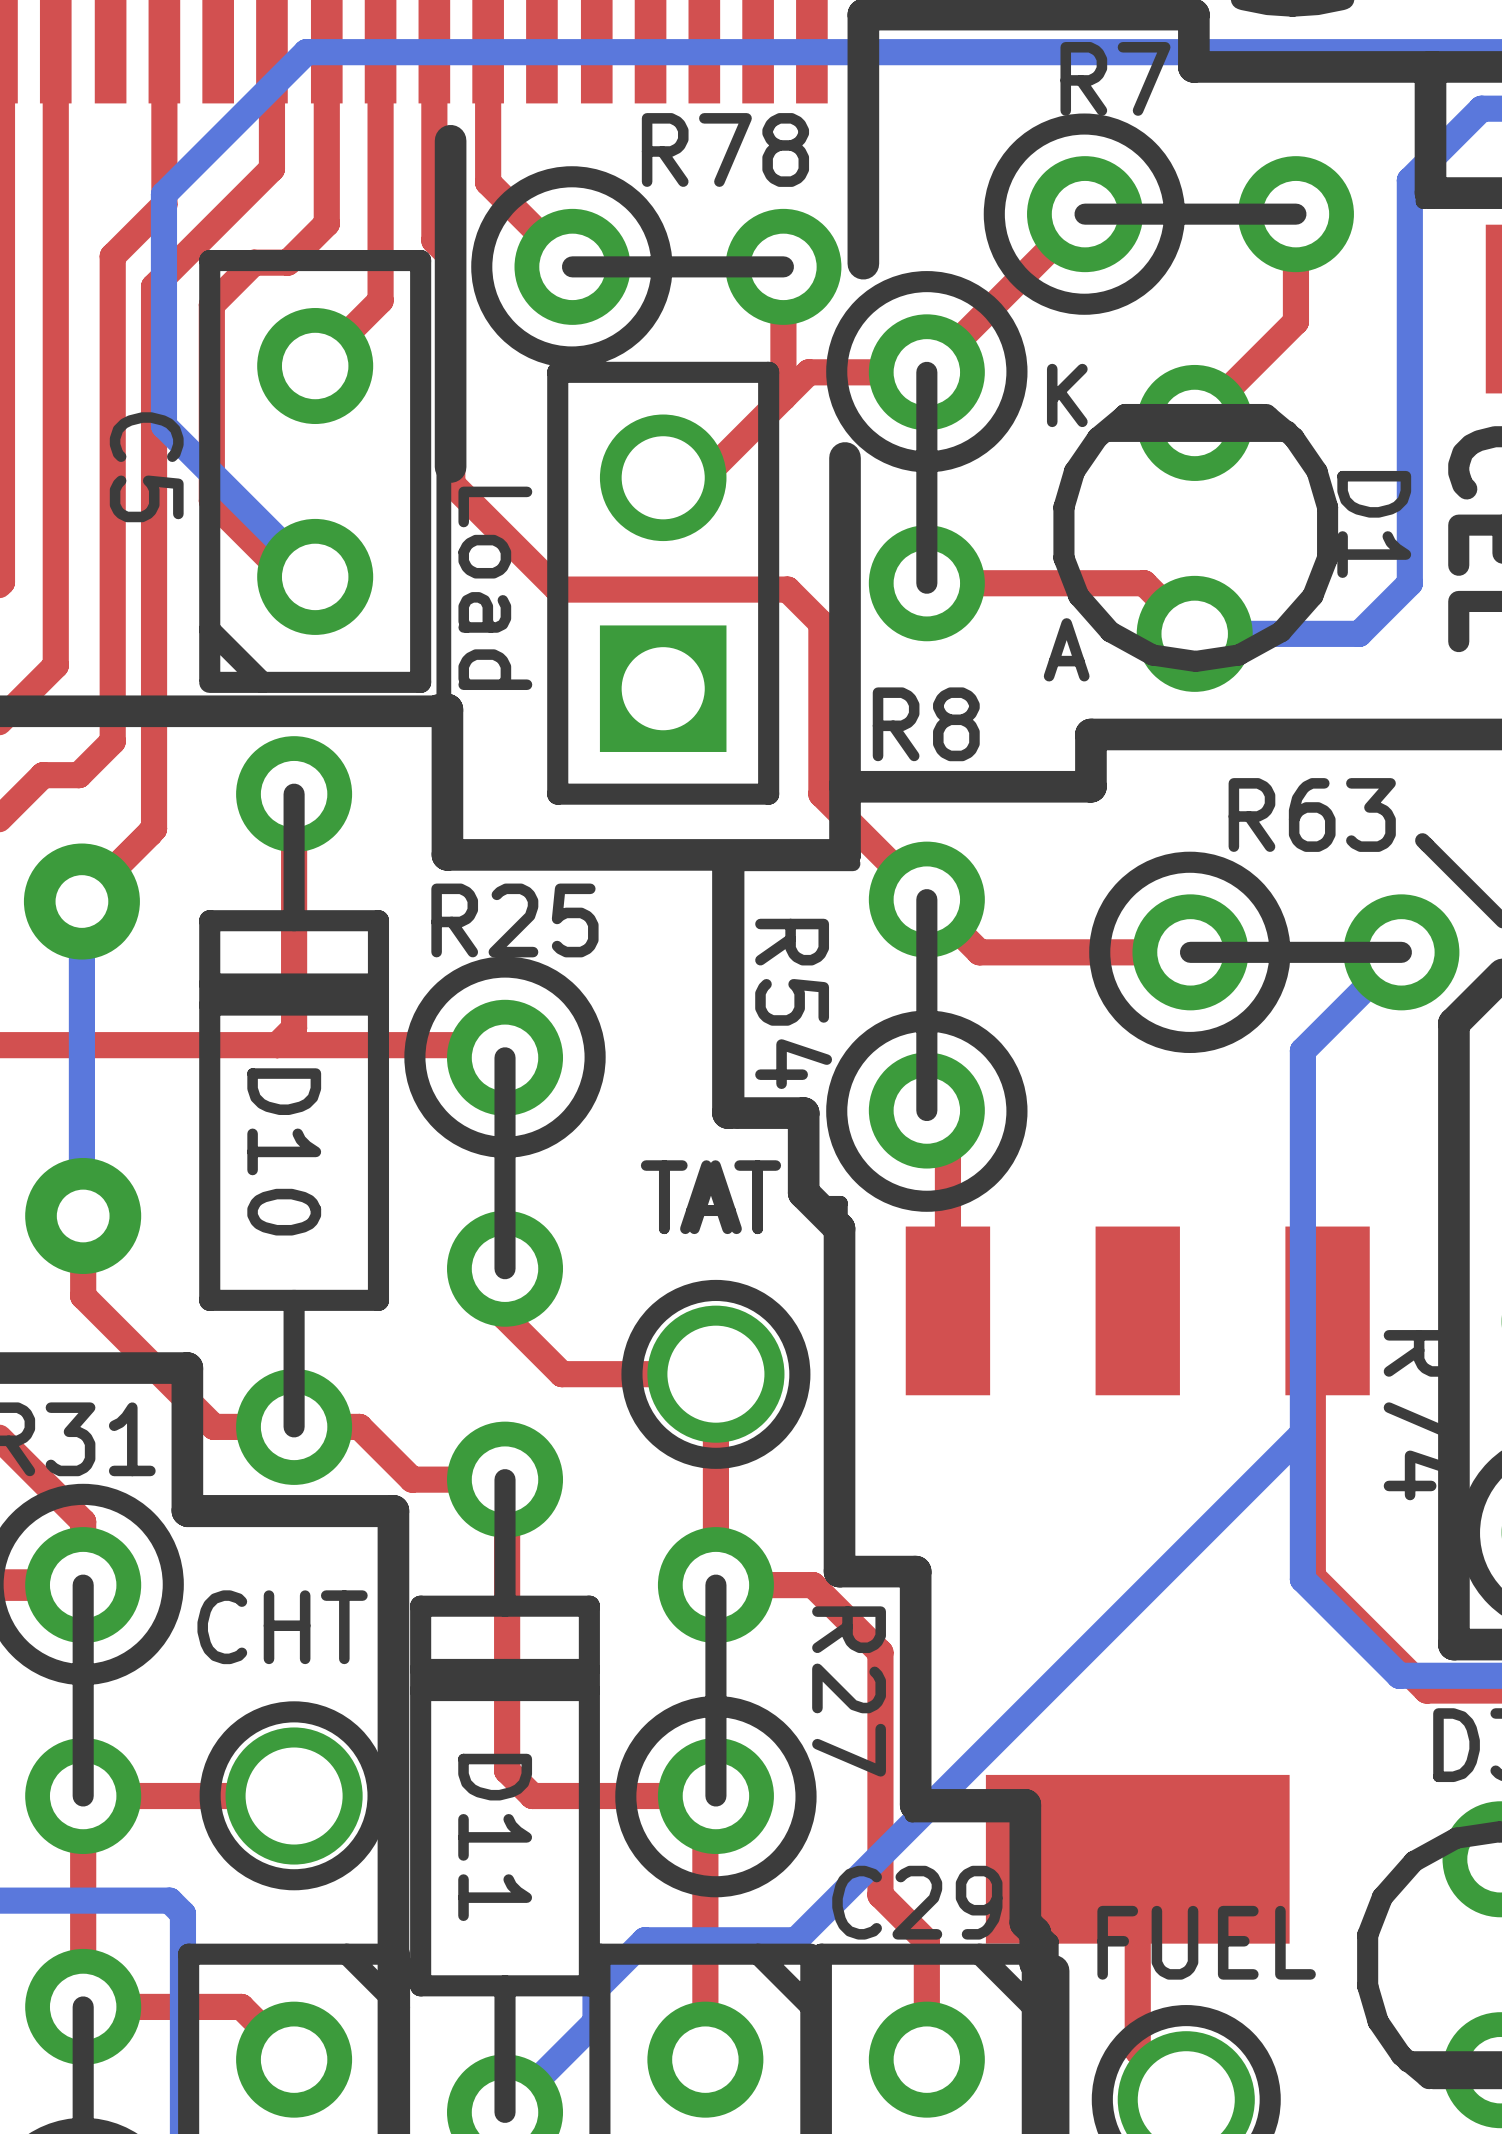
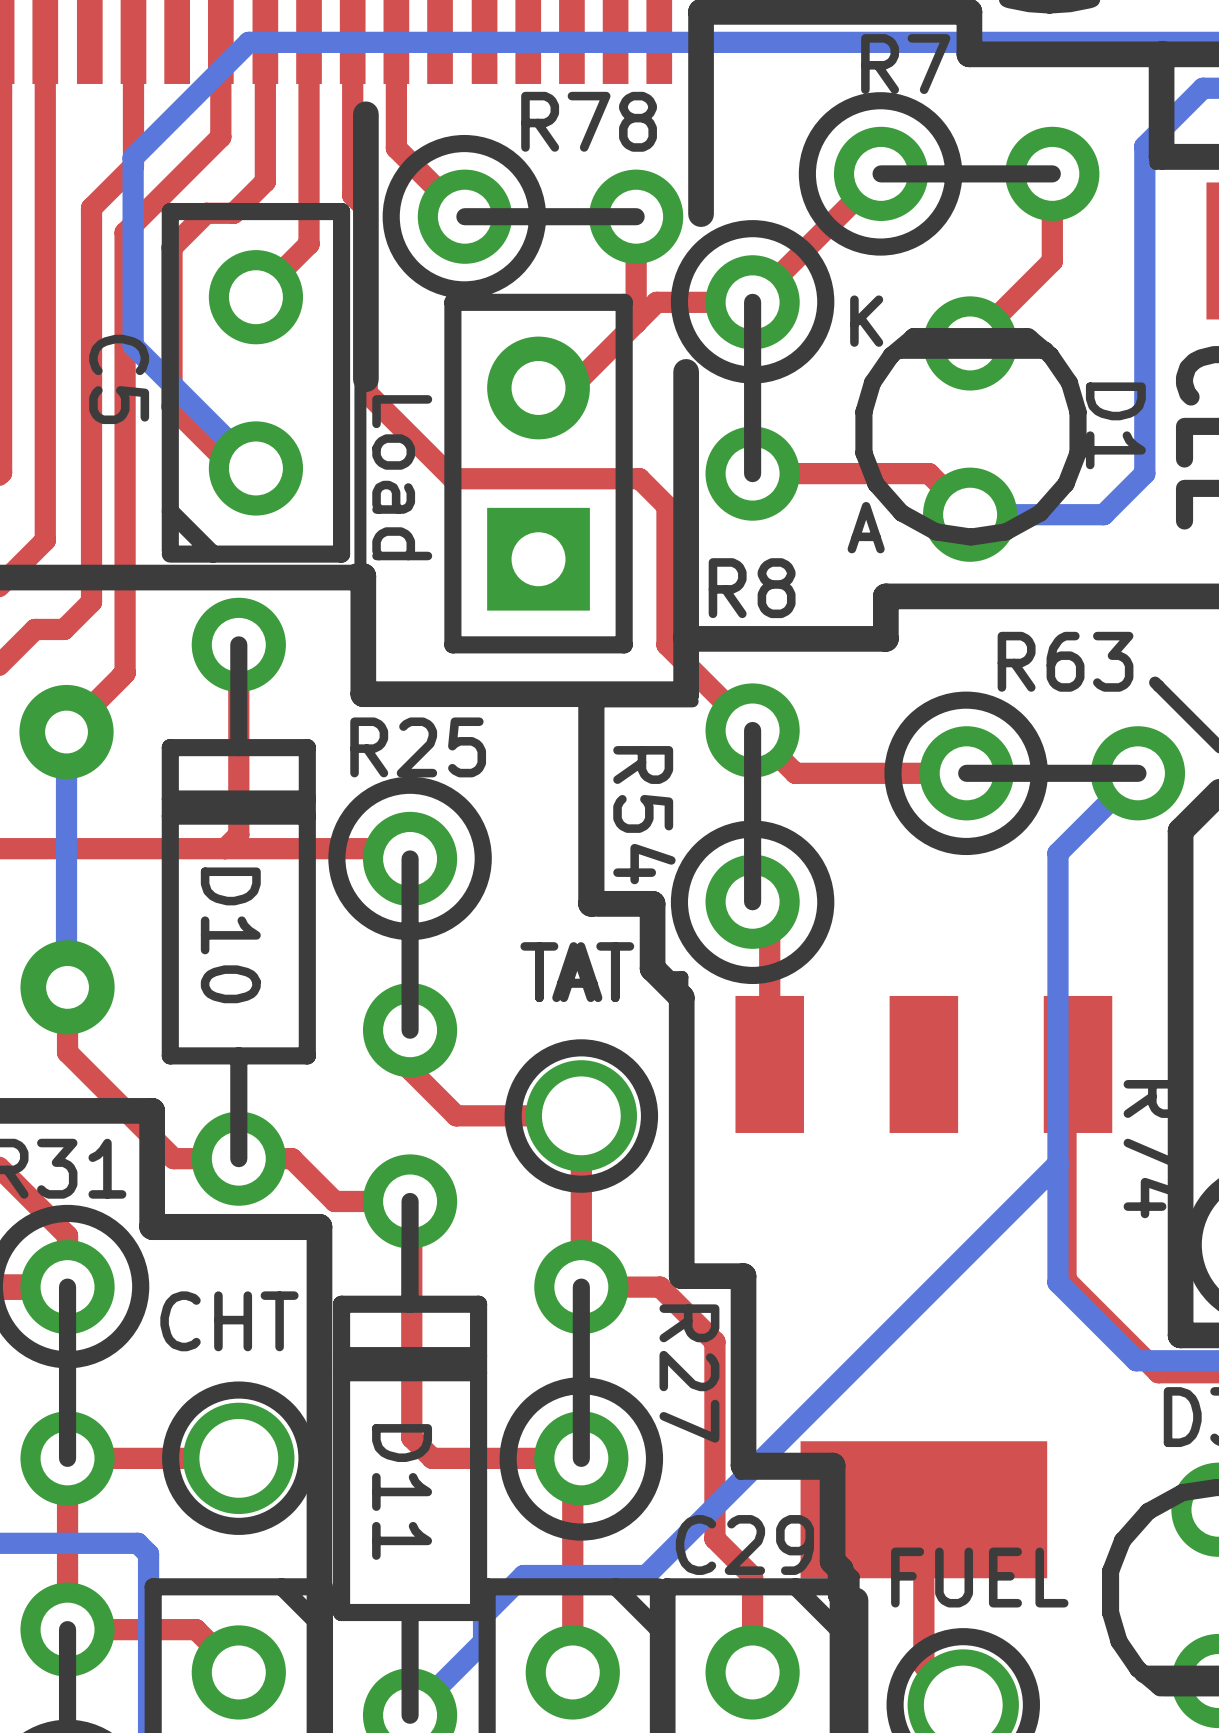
part footprint: [547, 361, 780, 805] -> [444, 293, 633, 654]

